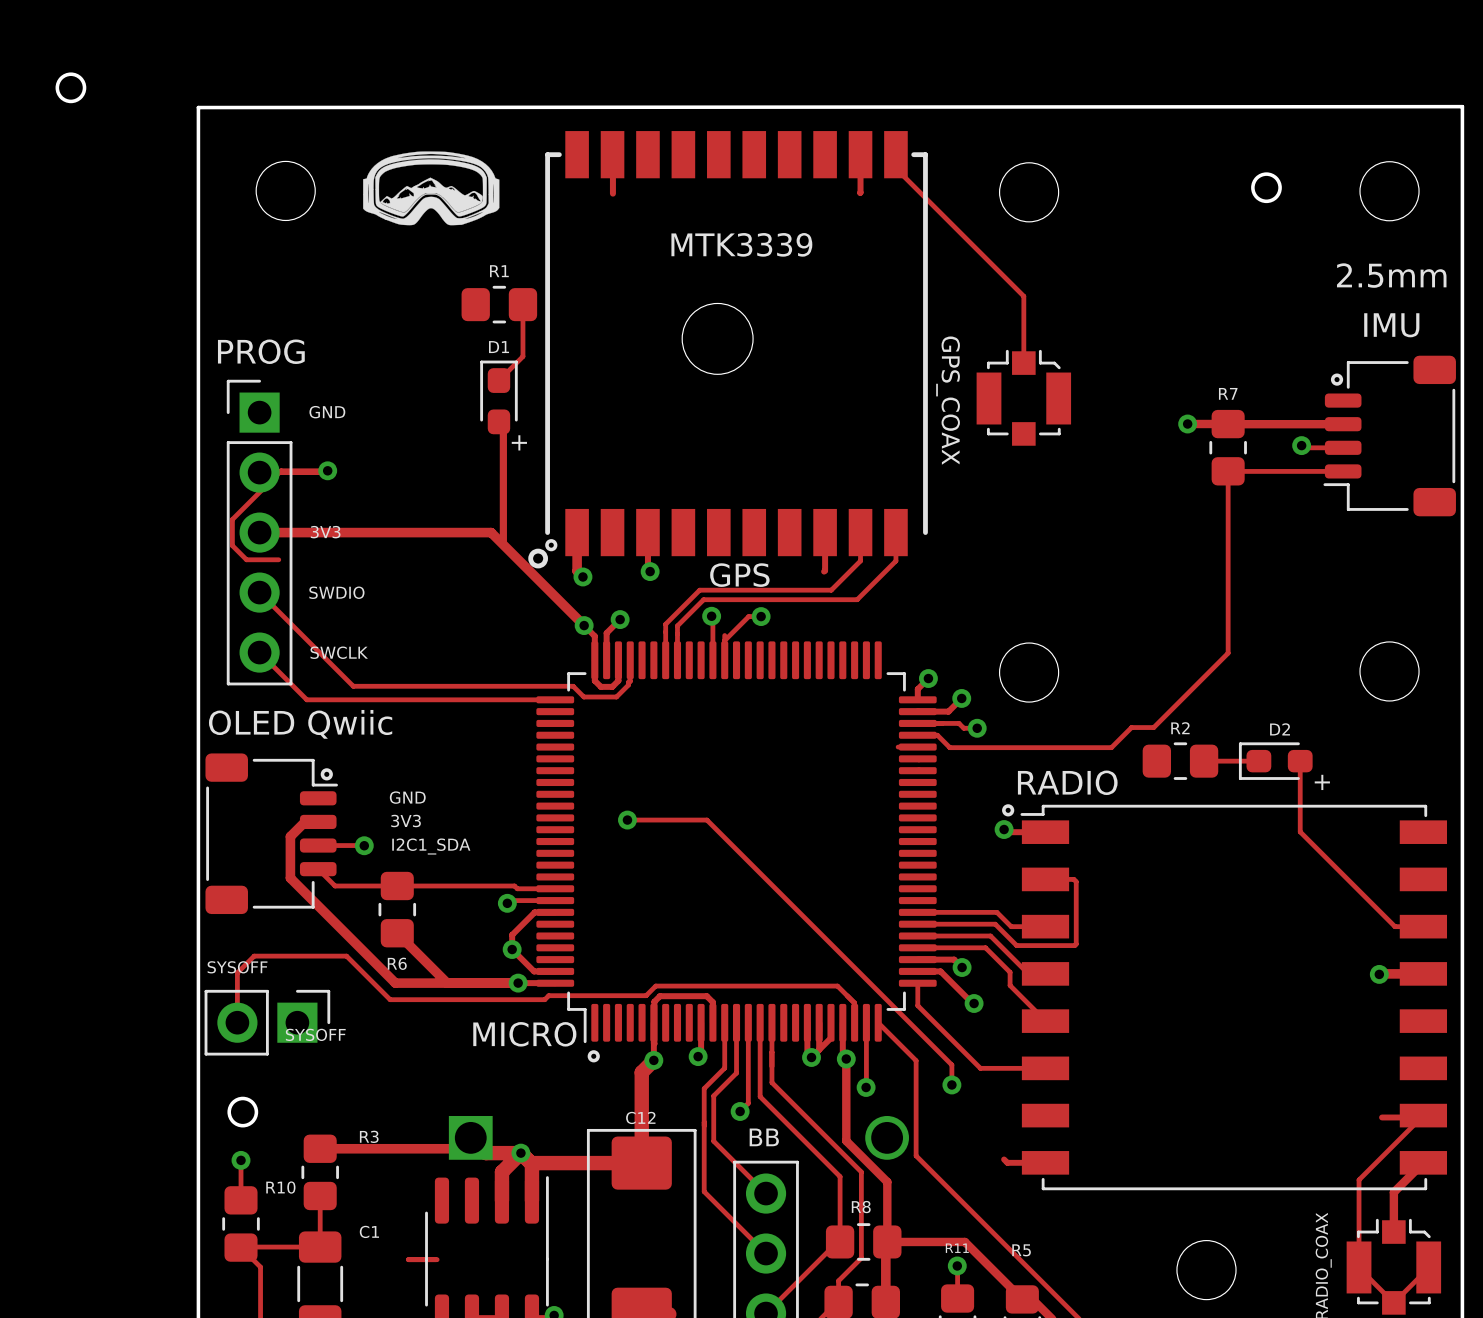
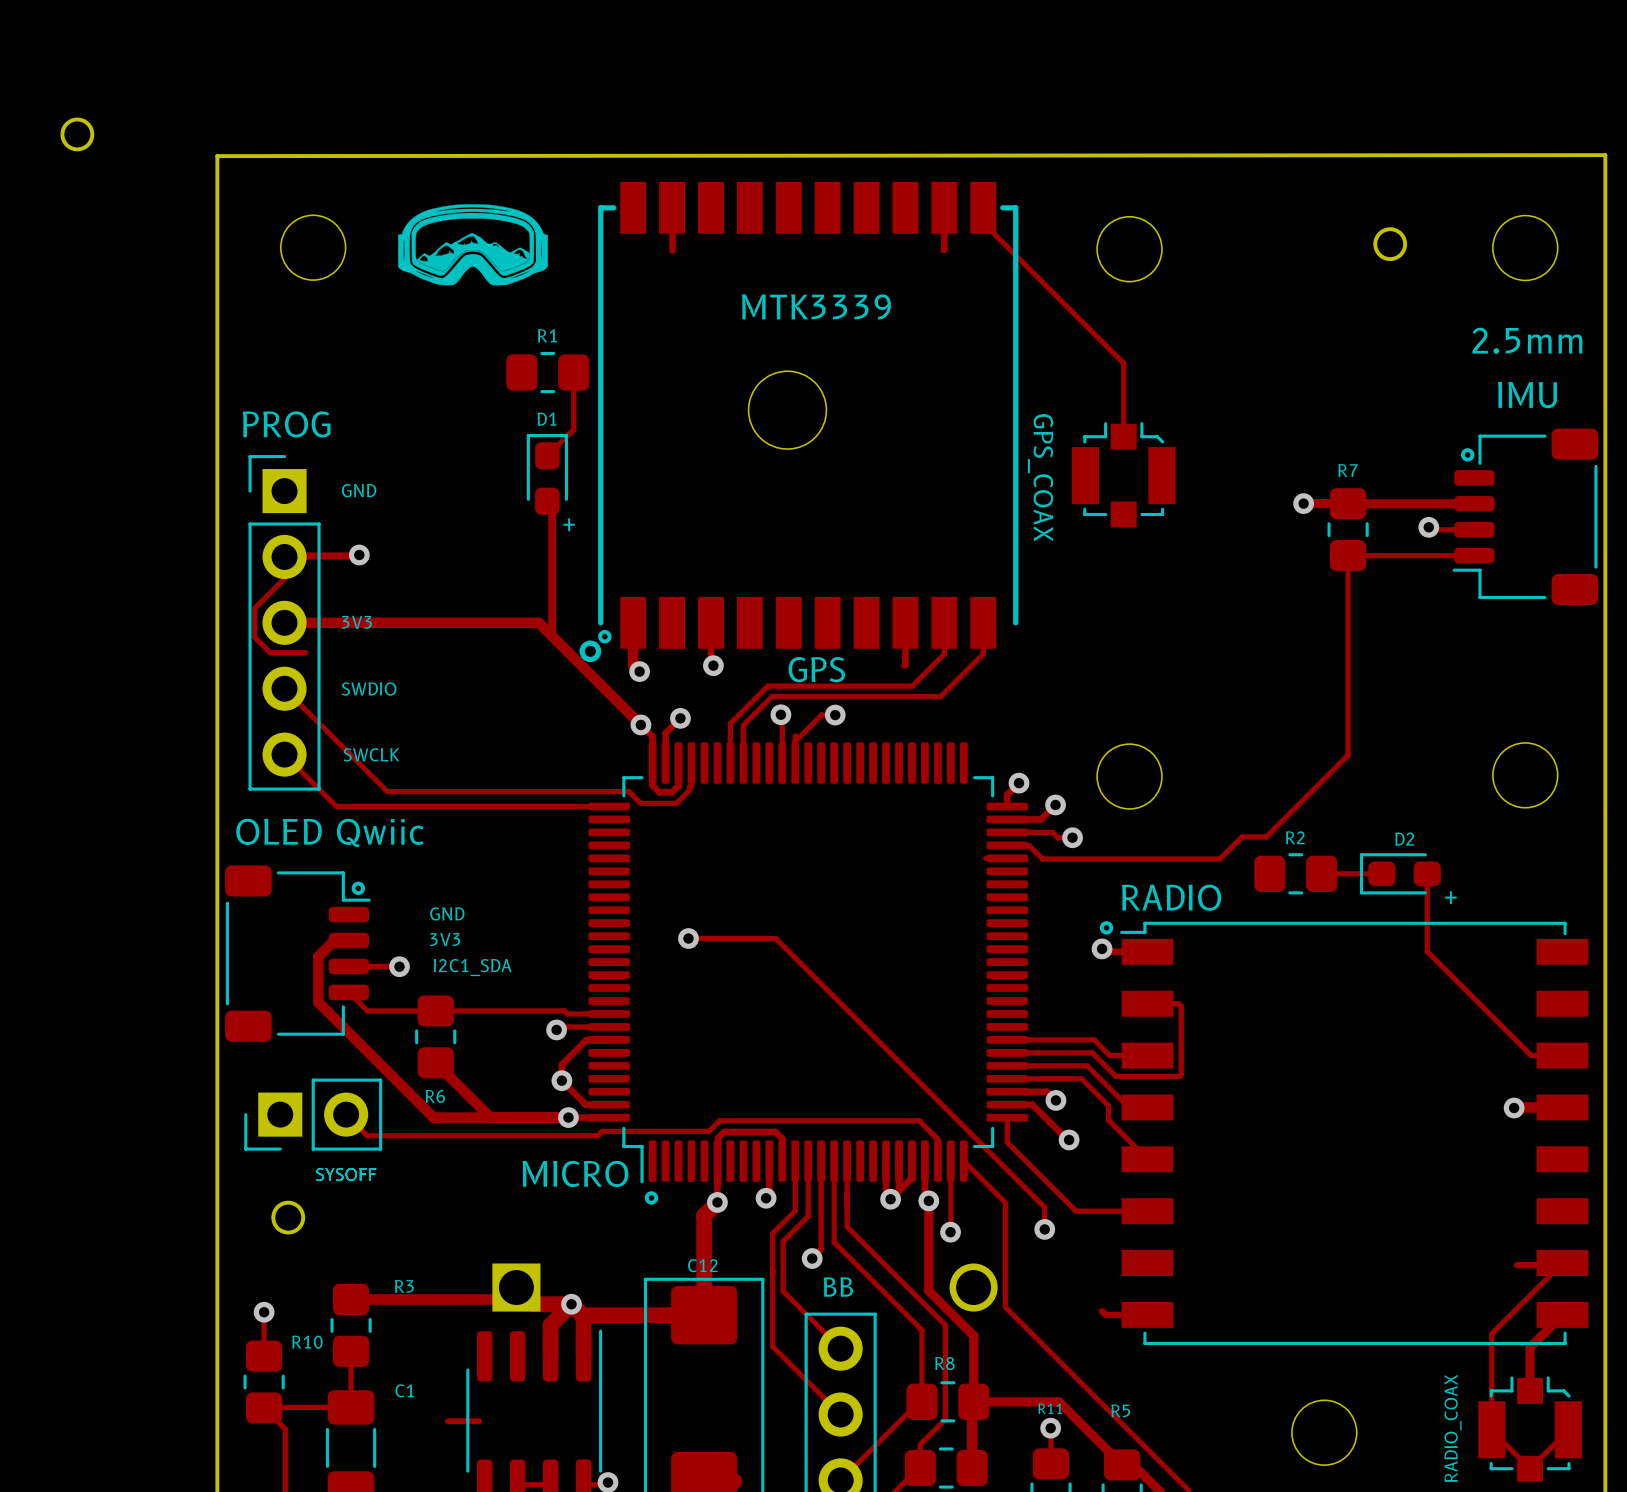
track: (390, 999) (346, 956) (254, 956) (237, 972) (237, 1022) -> (427, 1135) (367, 1135) (346, 1114)
SYSOFF rotation: 0° (267, 1022) -> 180° (313, 1114)
round board edge position: (242, 1112) -> (288, 1217)

